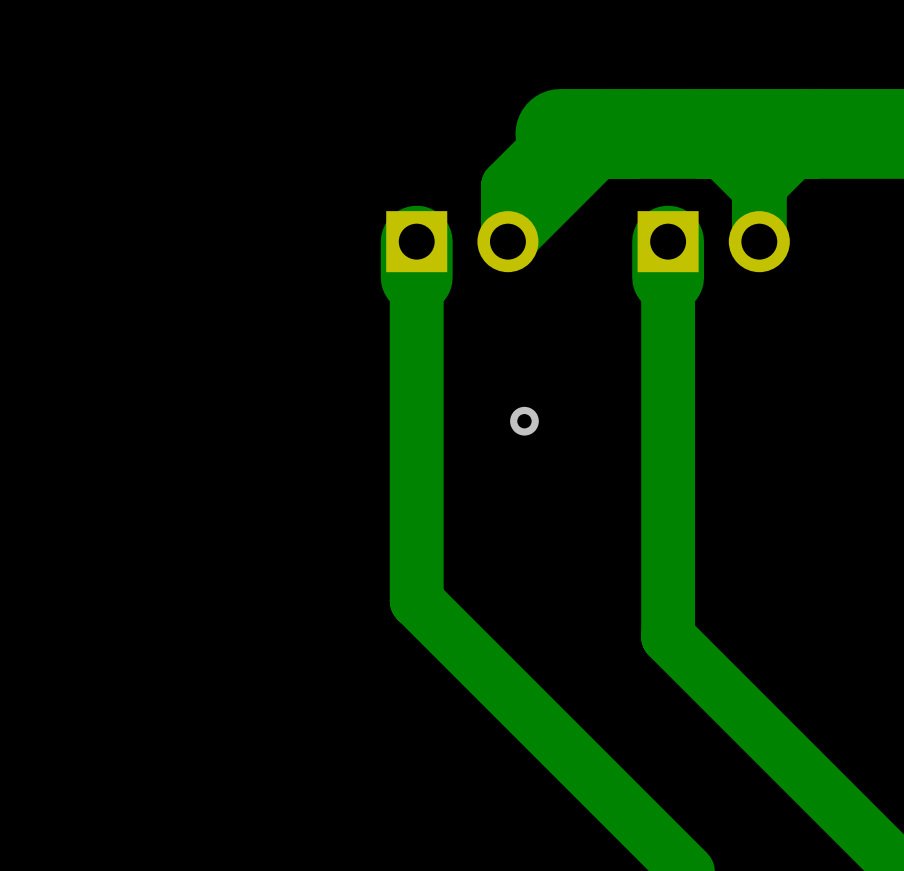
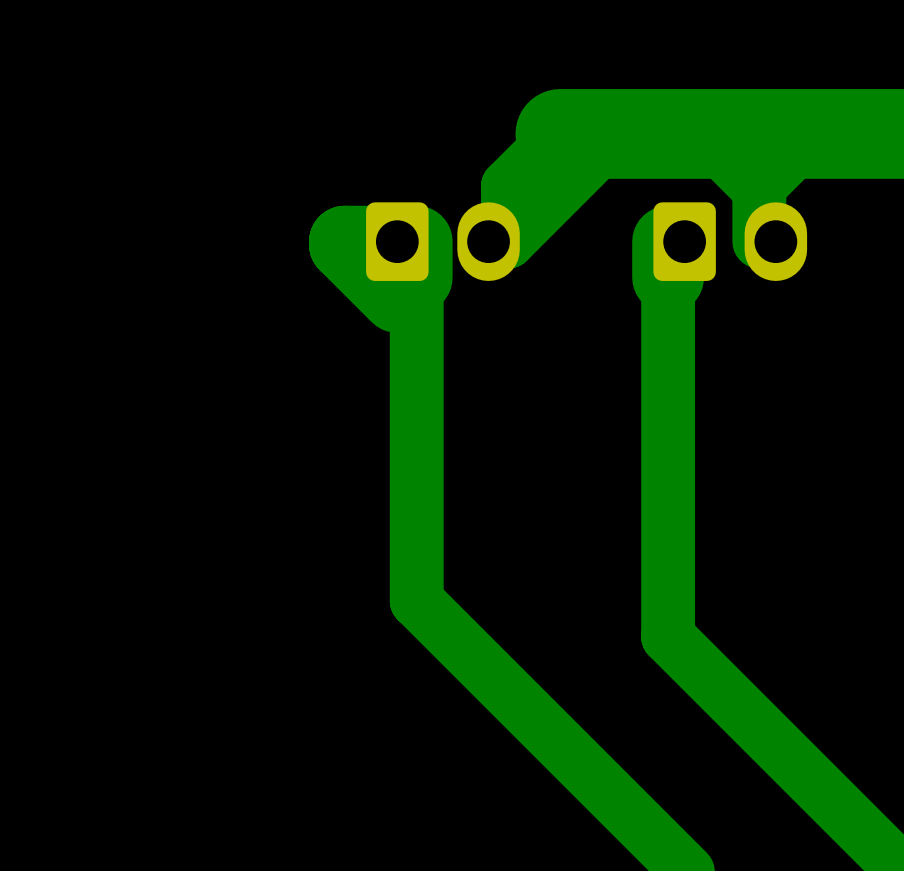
part footprint: [386, 211, 539, 273] -> [366, 202, 520, 281]
part footprint: [637, 211, 790, 273] -> [653, 202, 808, 281]
bottom track: none -> (397, 241) (344, 241) (344, 244) (397, 296)
via: (524, 421) -> none

